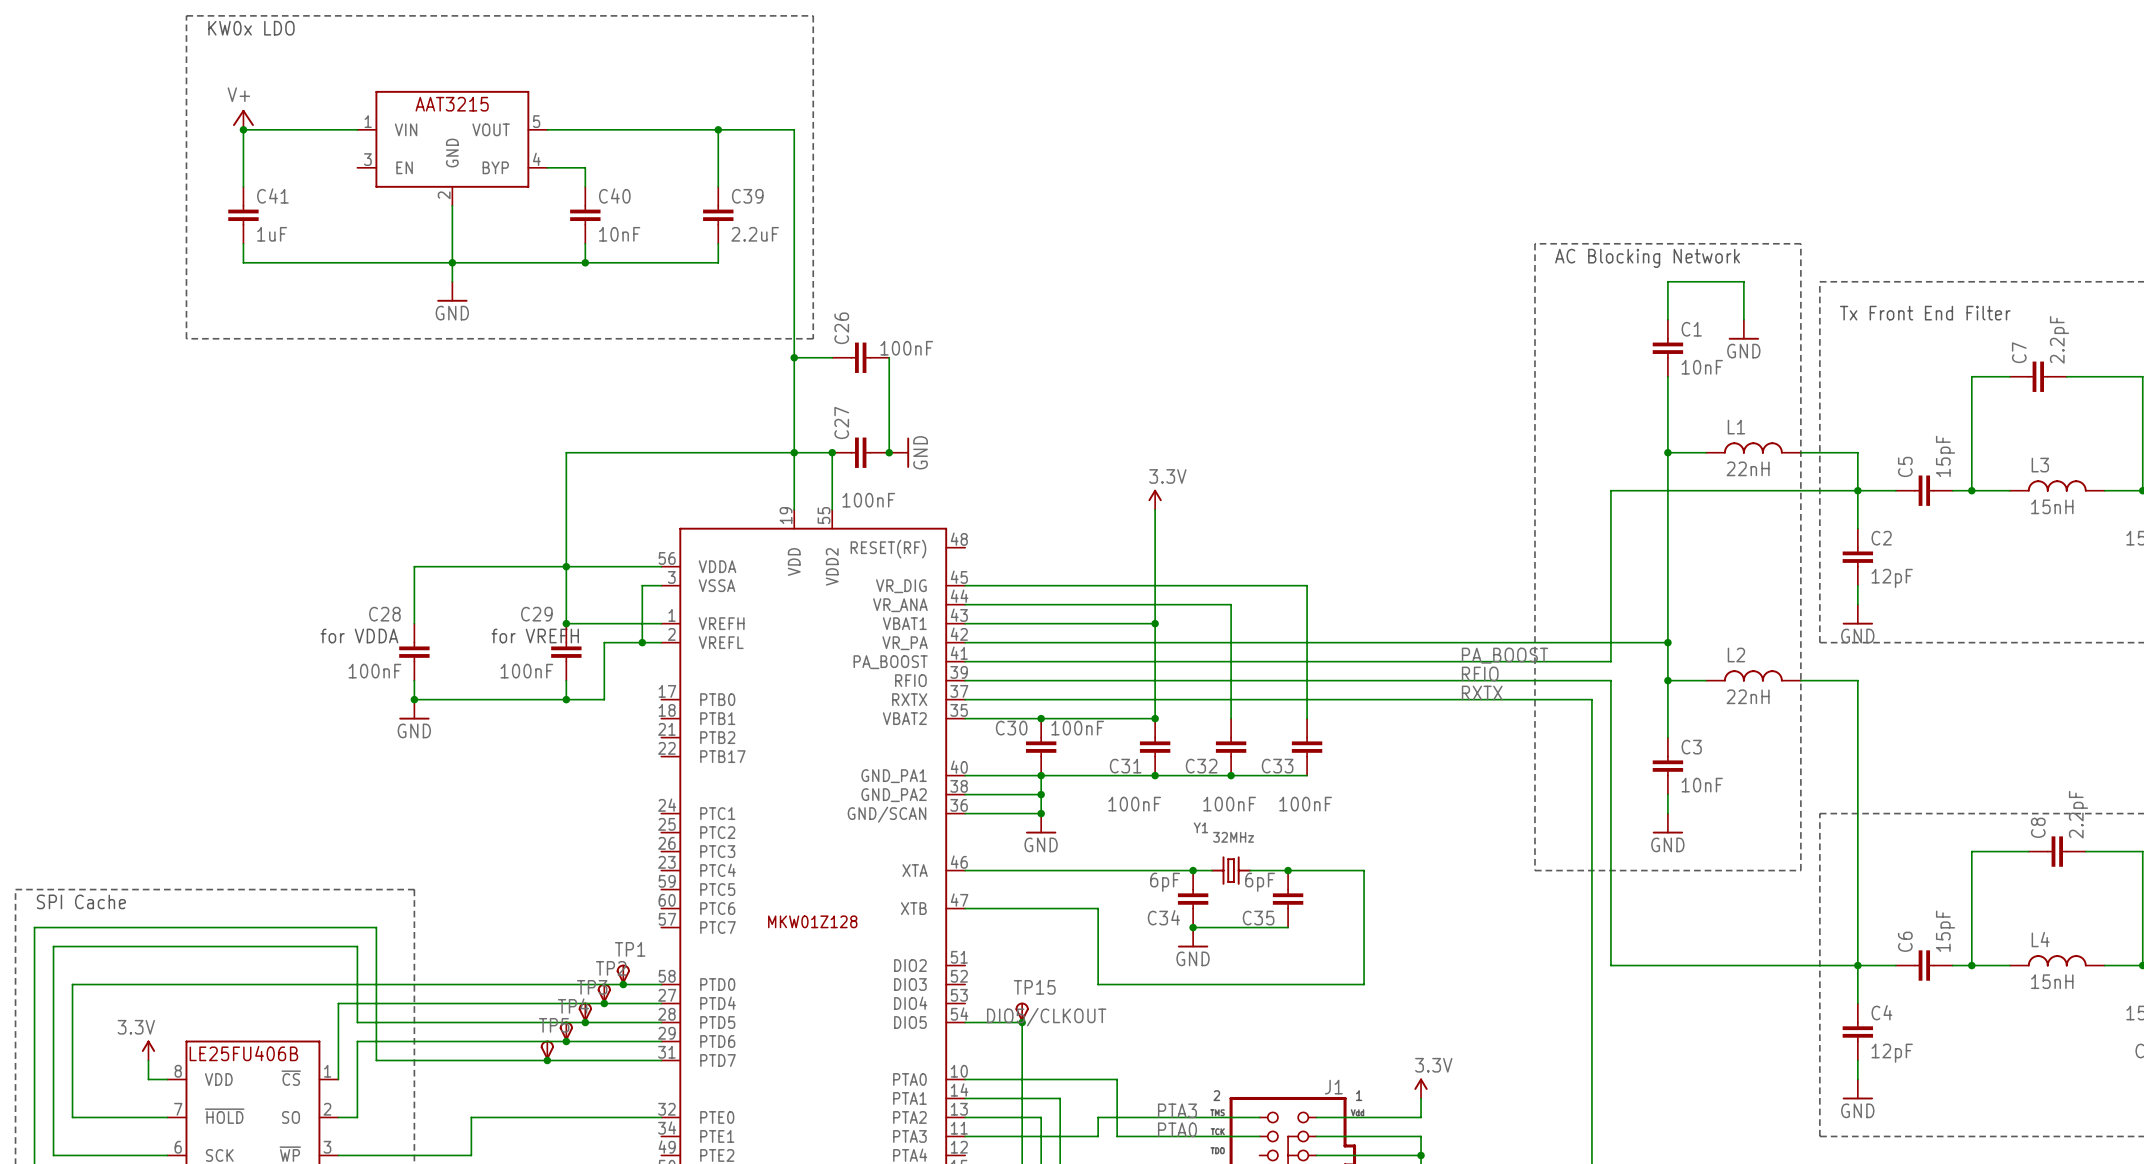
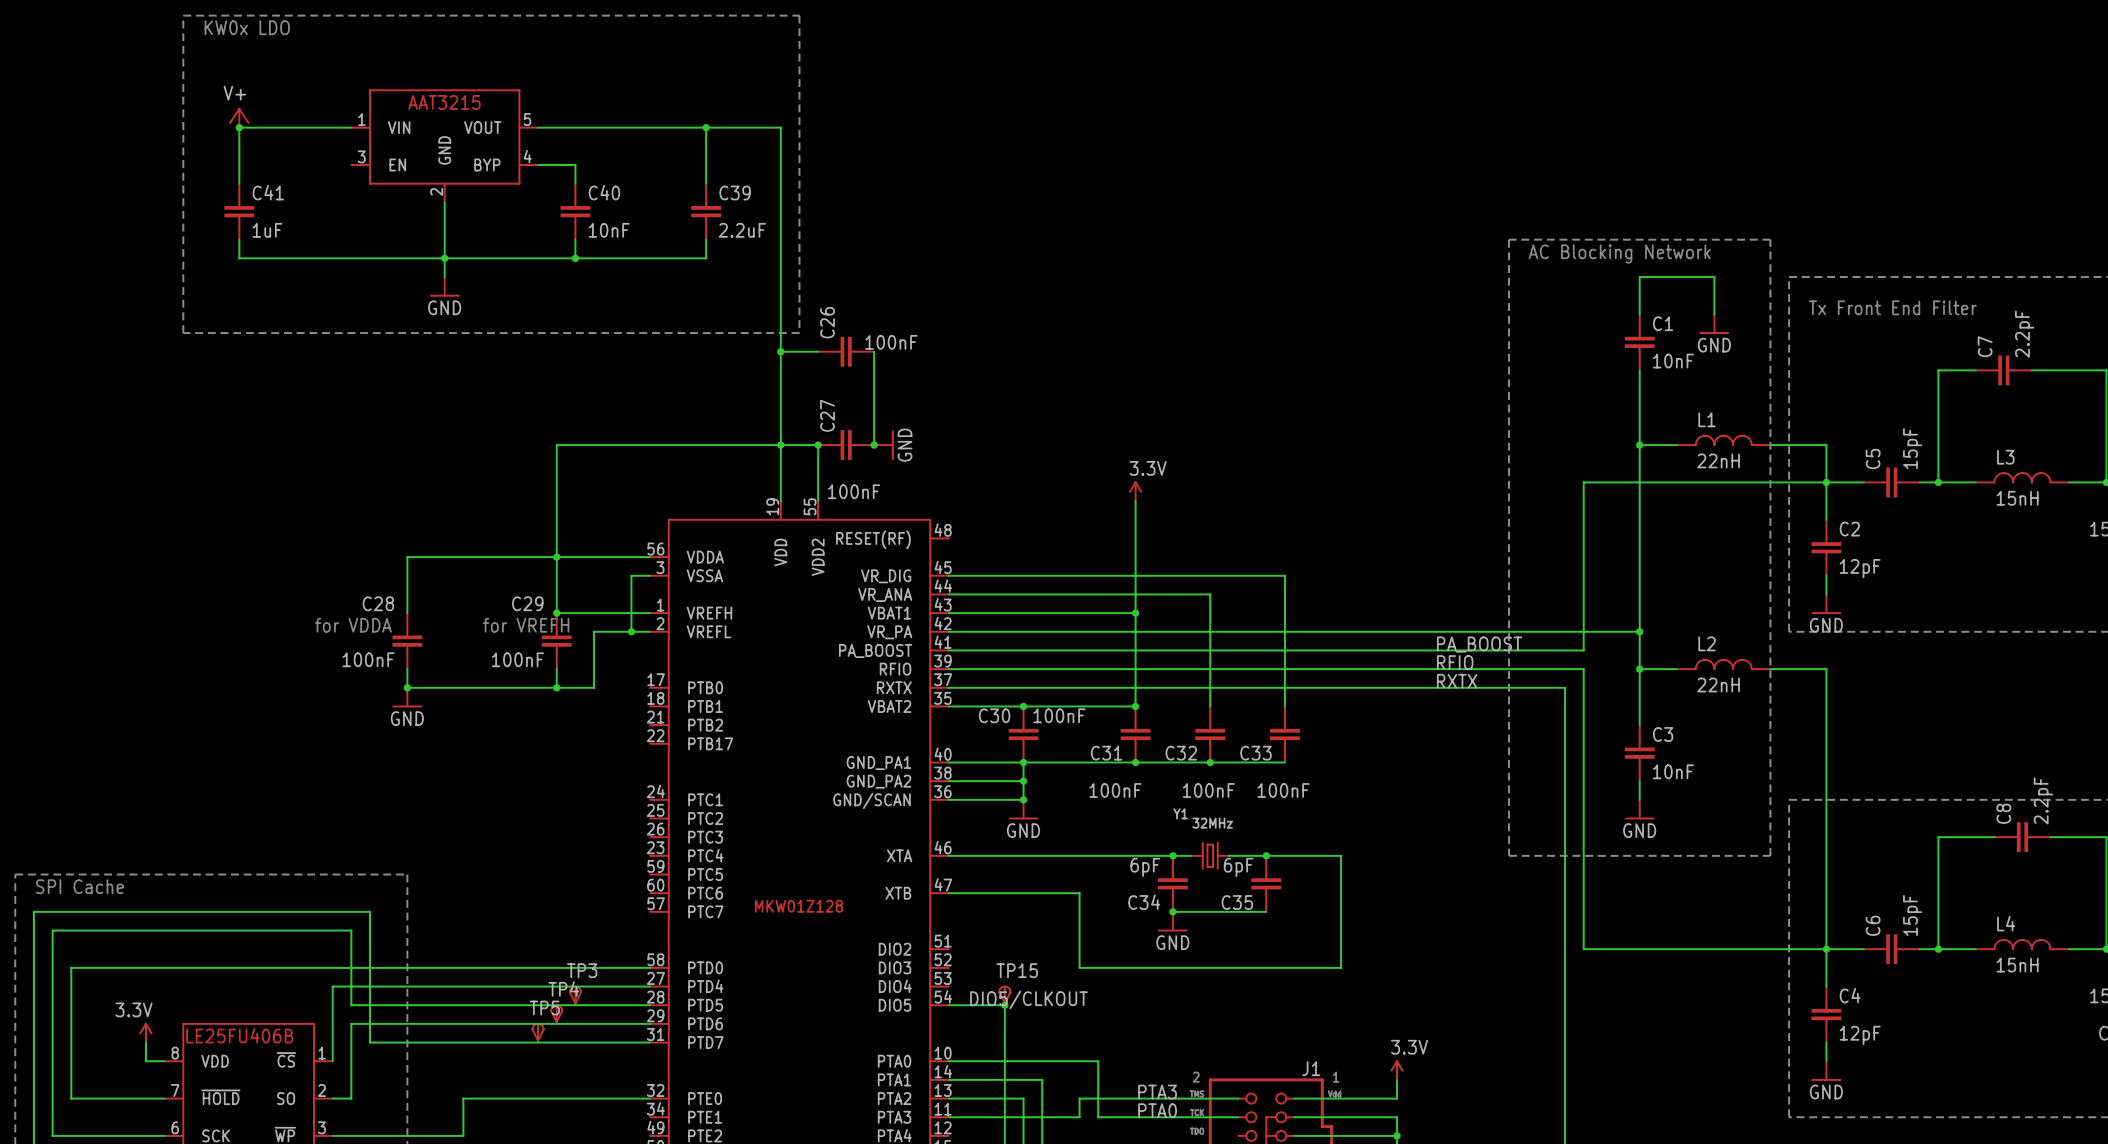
TP1: (623, 974) -> none
junction: (623, 984) -> none
TP2: (604, 993) -> none
junction: (604, 1003) -> none
junction: (585, 1022) -> none
junction: (566, 1041) -> none
junction: (547, 1060) -> none

